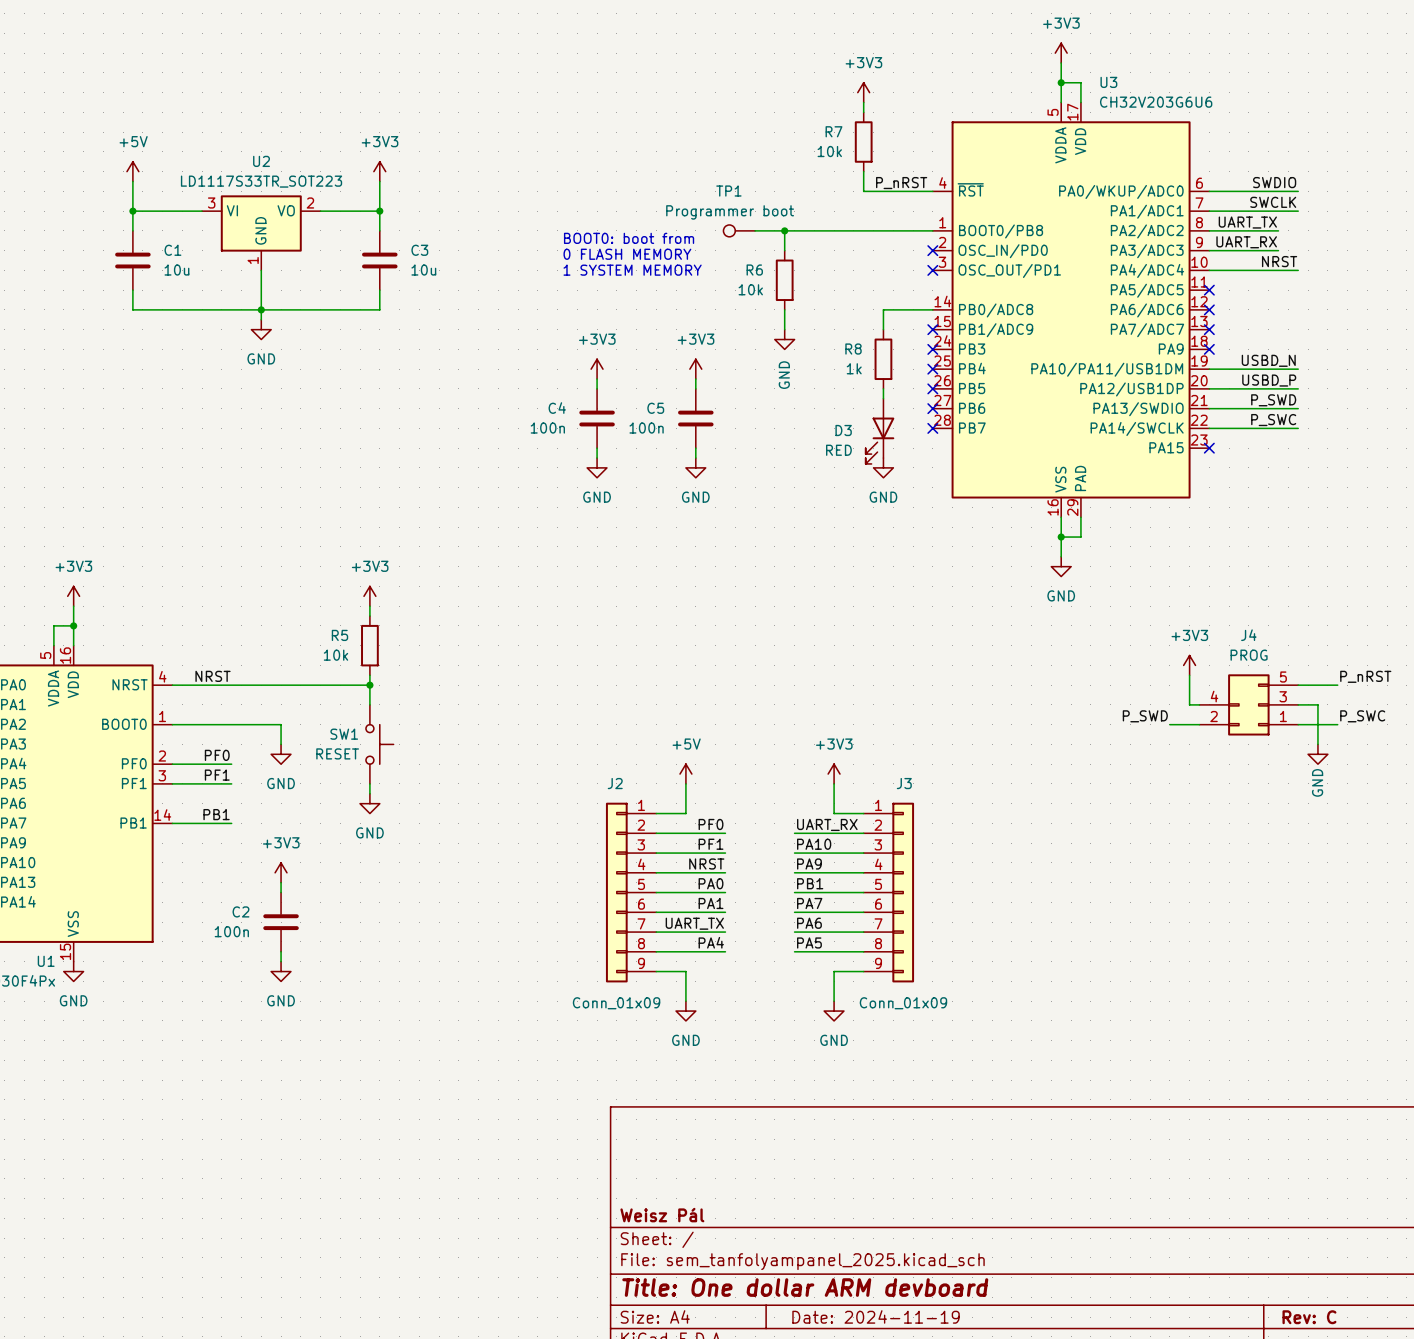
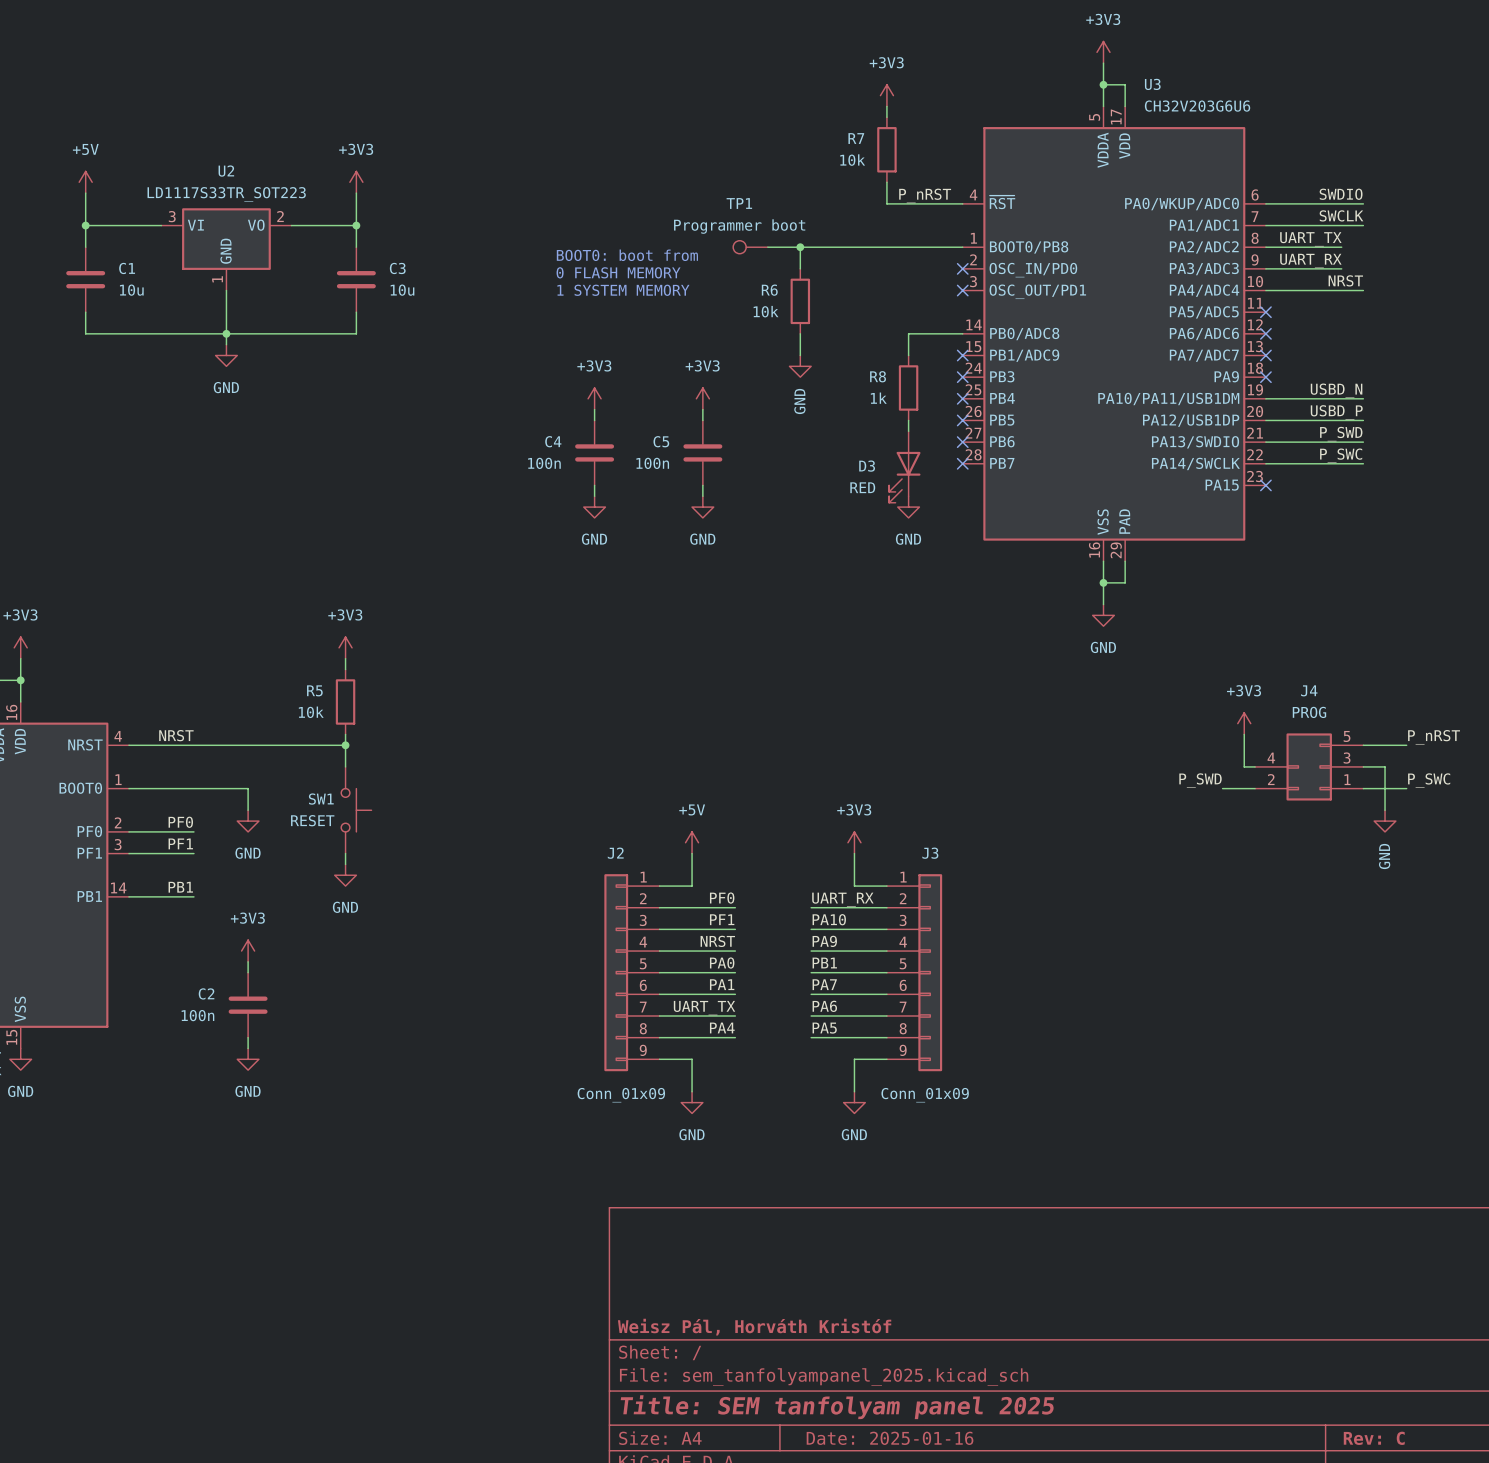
title block: Weisz Pál (662, 1215) -> Weisz Pál, Horváth Kristóf (754, 1327)
title block: Title: One dollar ARM devboard (805, 1287) -> Title: SEM tanfolyam panel 2025 (837, 1407)
title block: Date: 2024-11-19 (876, 1316) -> Date: 2025-01-16 (890, 1438)

